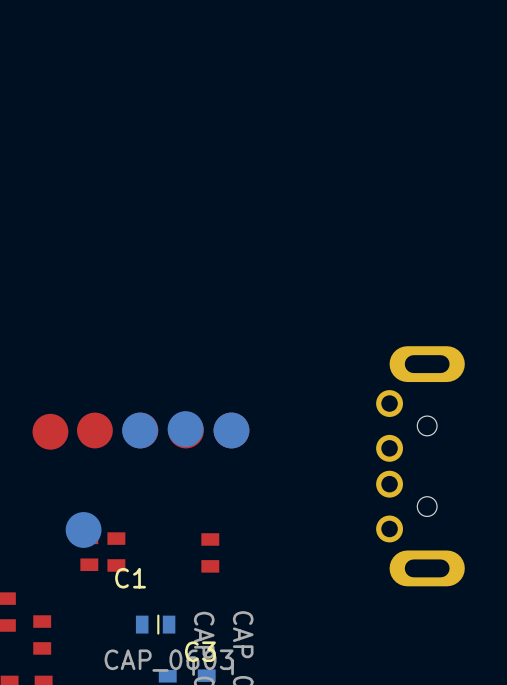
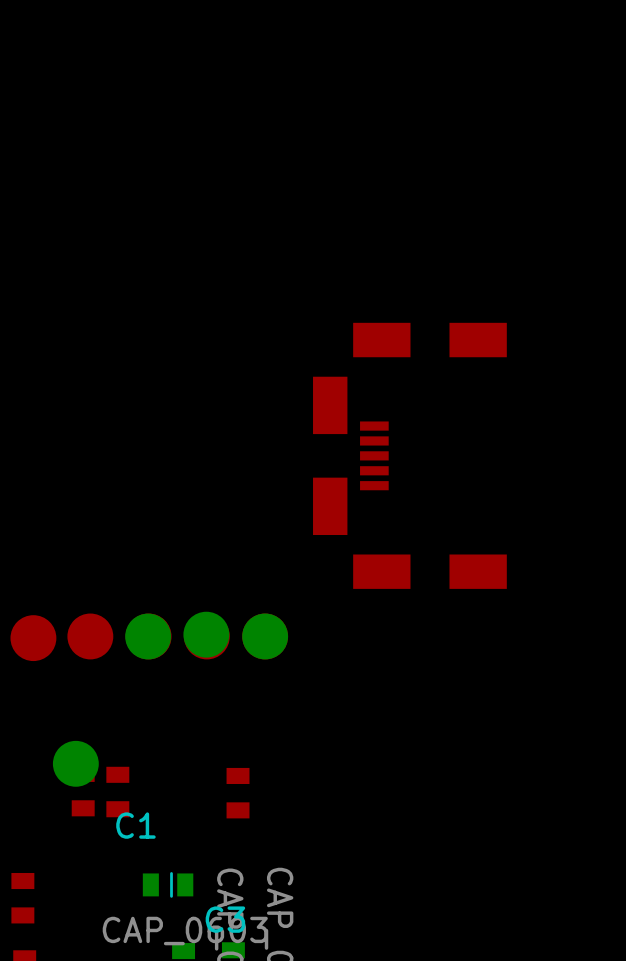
part: none -> (409, 455)
part: (420, 466) -> none

